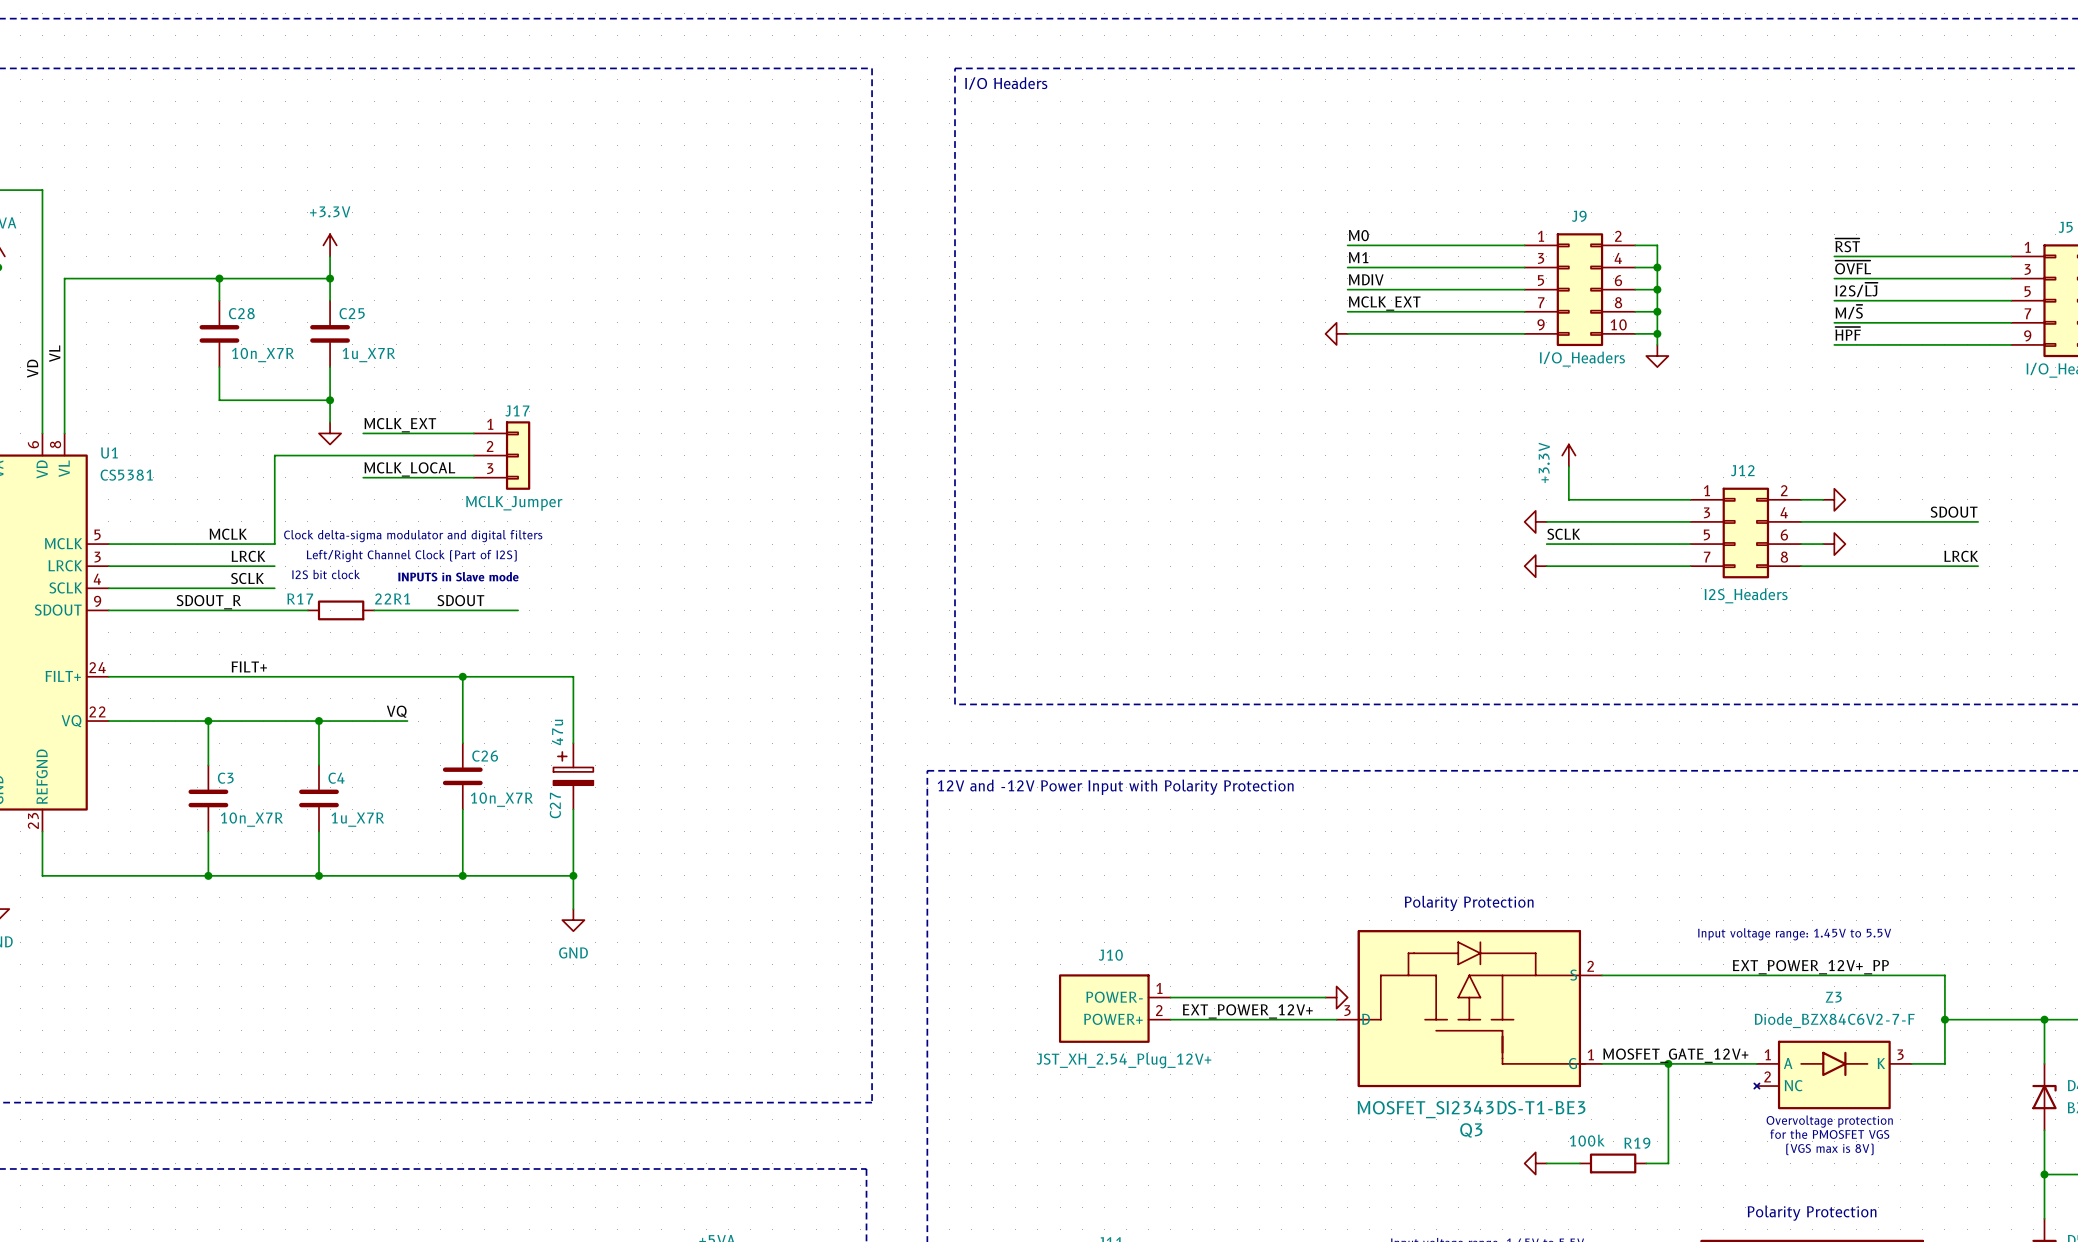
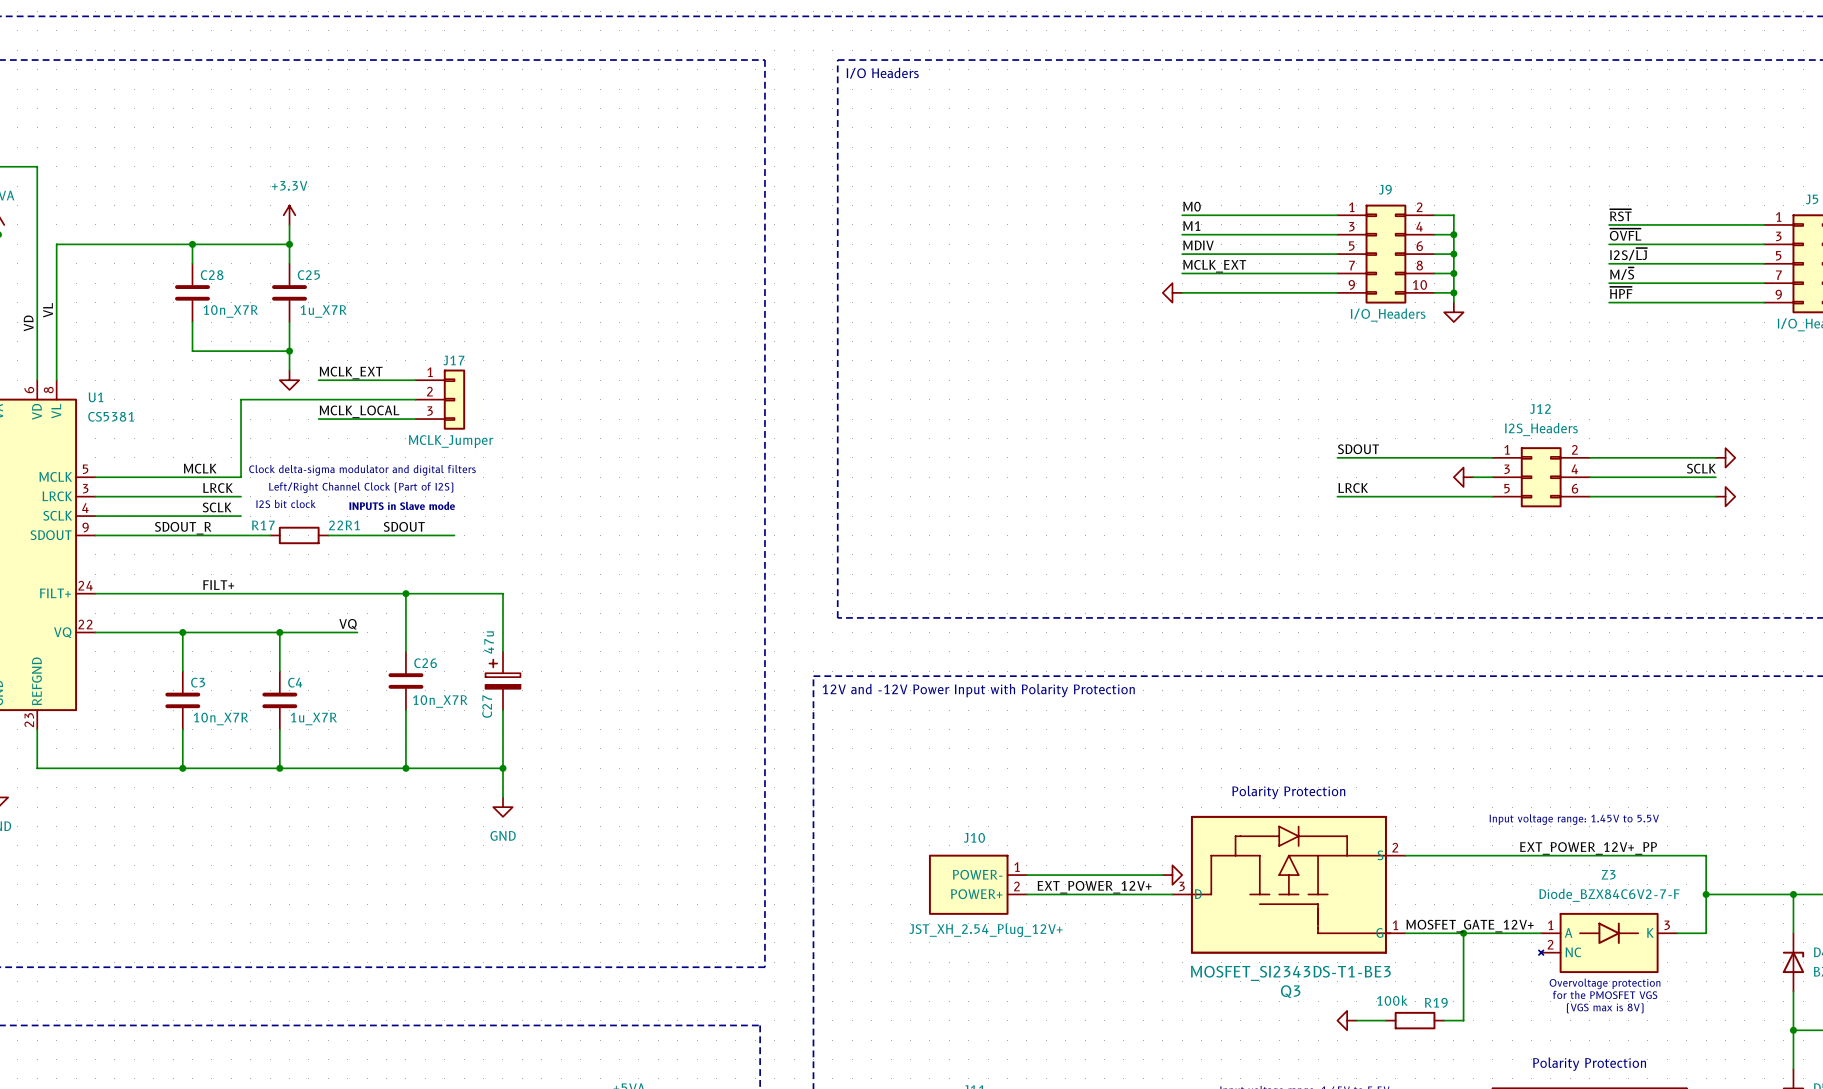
power symbol: +3.3V (1568, 455) -> none
wire: (1568, 466) (1568, 499) (1690, 499) -> none
J12 symbol: [1690, 487, 1802, 579] -> [1492, 447, 1590, 508]
wire: (1801, 499) (1823, 499) -> none
power symbol: (1834, 499) -> none
label: none -> SDOUT (1358, 449)
label: SDOUT (1954, 512) -> none
power symbol: (1535, 521) -> none
power symbol: none -> (1725, 457)
label: SCLK (1563, 534) -> none
label: none -> SCLK (1701, 468)
wire: (1546, 544) (1679, 544) -> none
power symbol: none -> (1463, 477)
wire: none -> (1599, 477) (1715, 477)
power symbol: (1834, 544) -> none
label: none -> LRCK (1353, 488)
label: LRCK (1961, 556) -> none
power symbol: (1535, 566) -> none
power symbol: none -> (1725, 496)
J12 value position: I2S_Headers (1746, 595) -> I2S_Headers (1541, 429)

